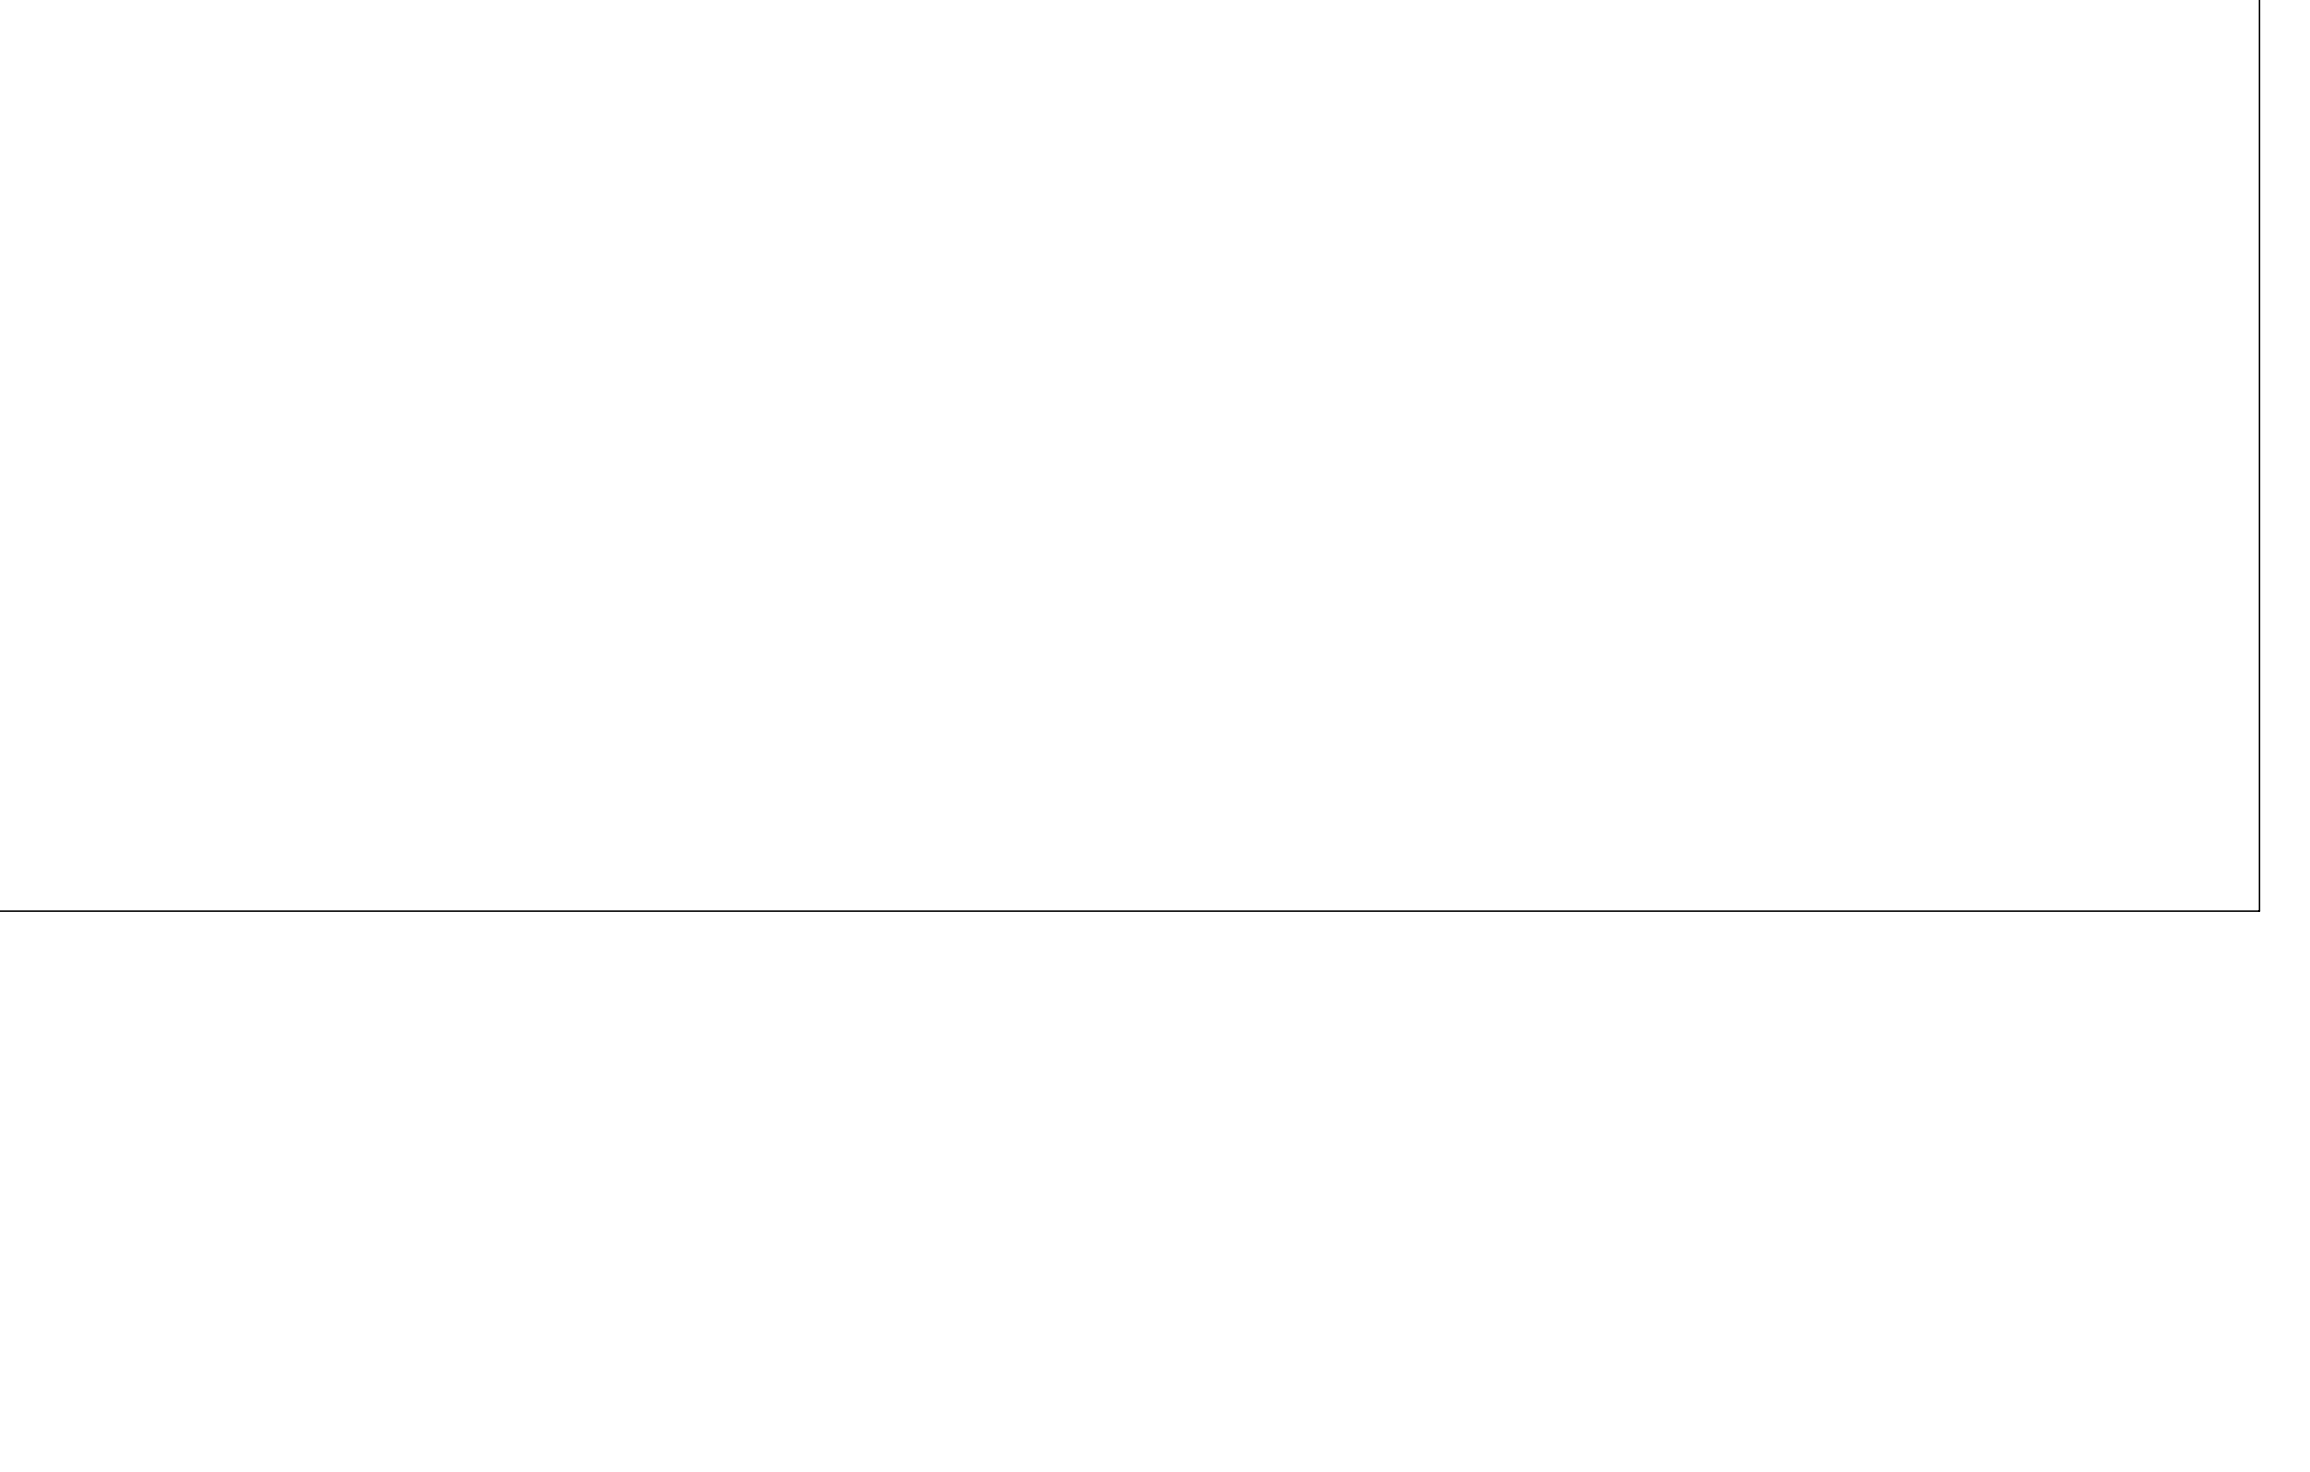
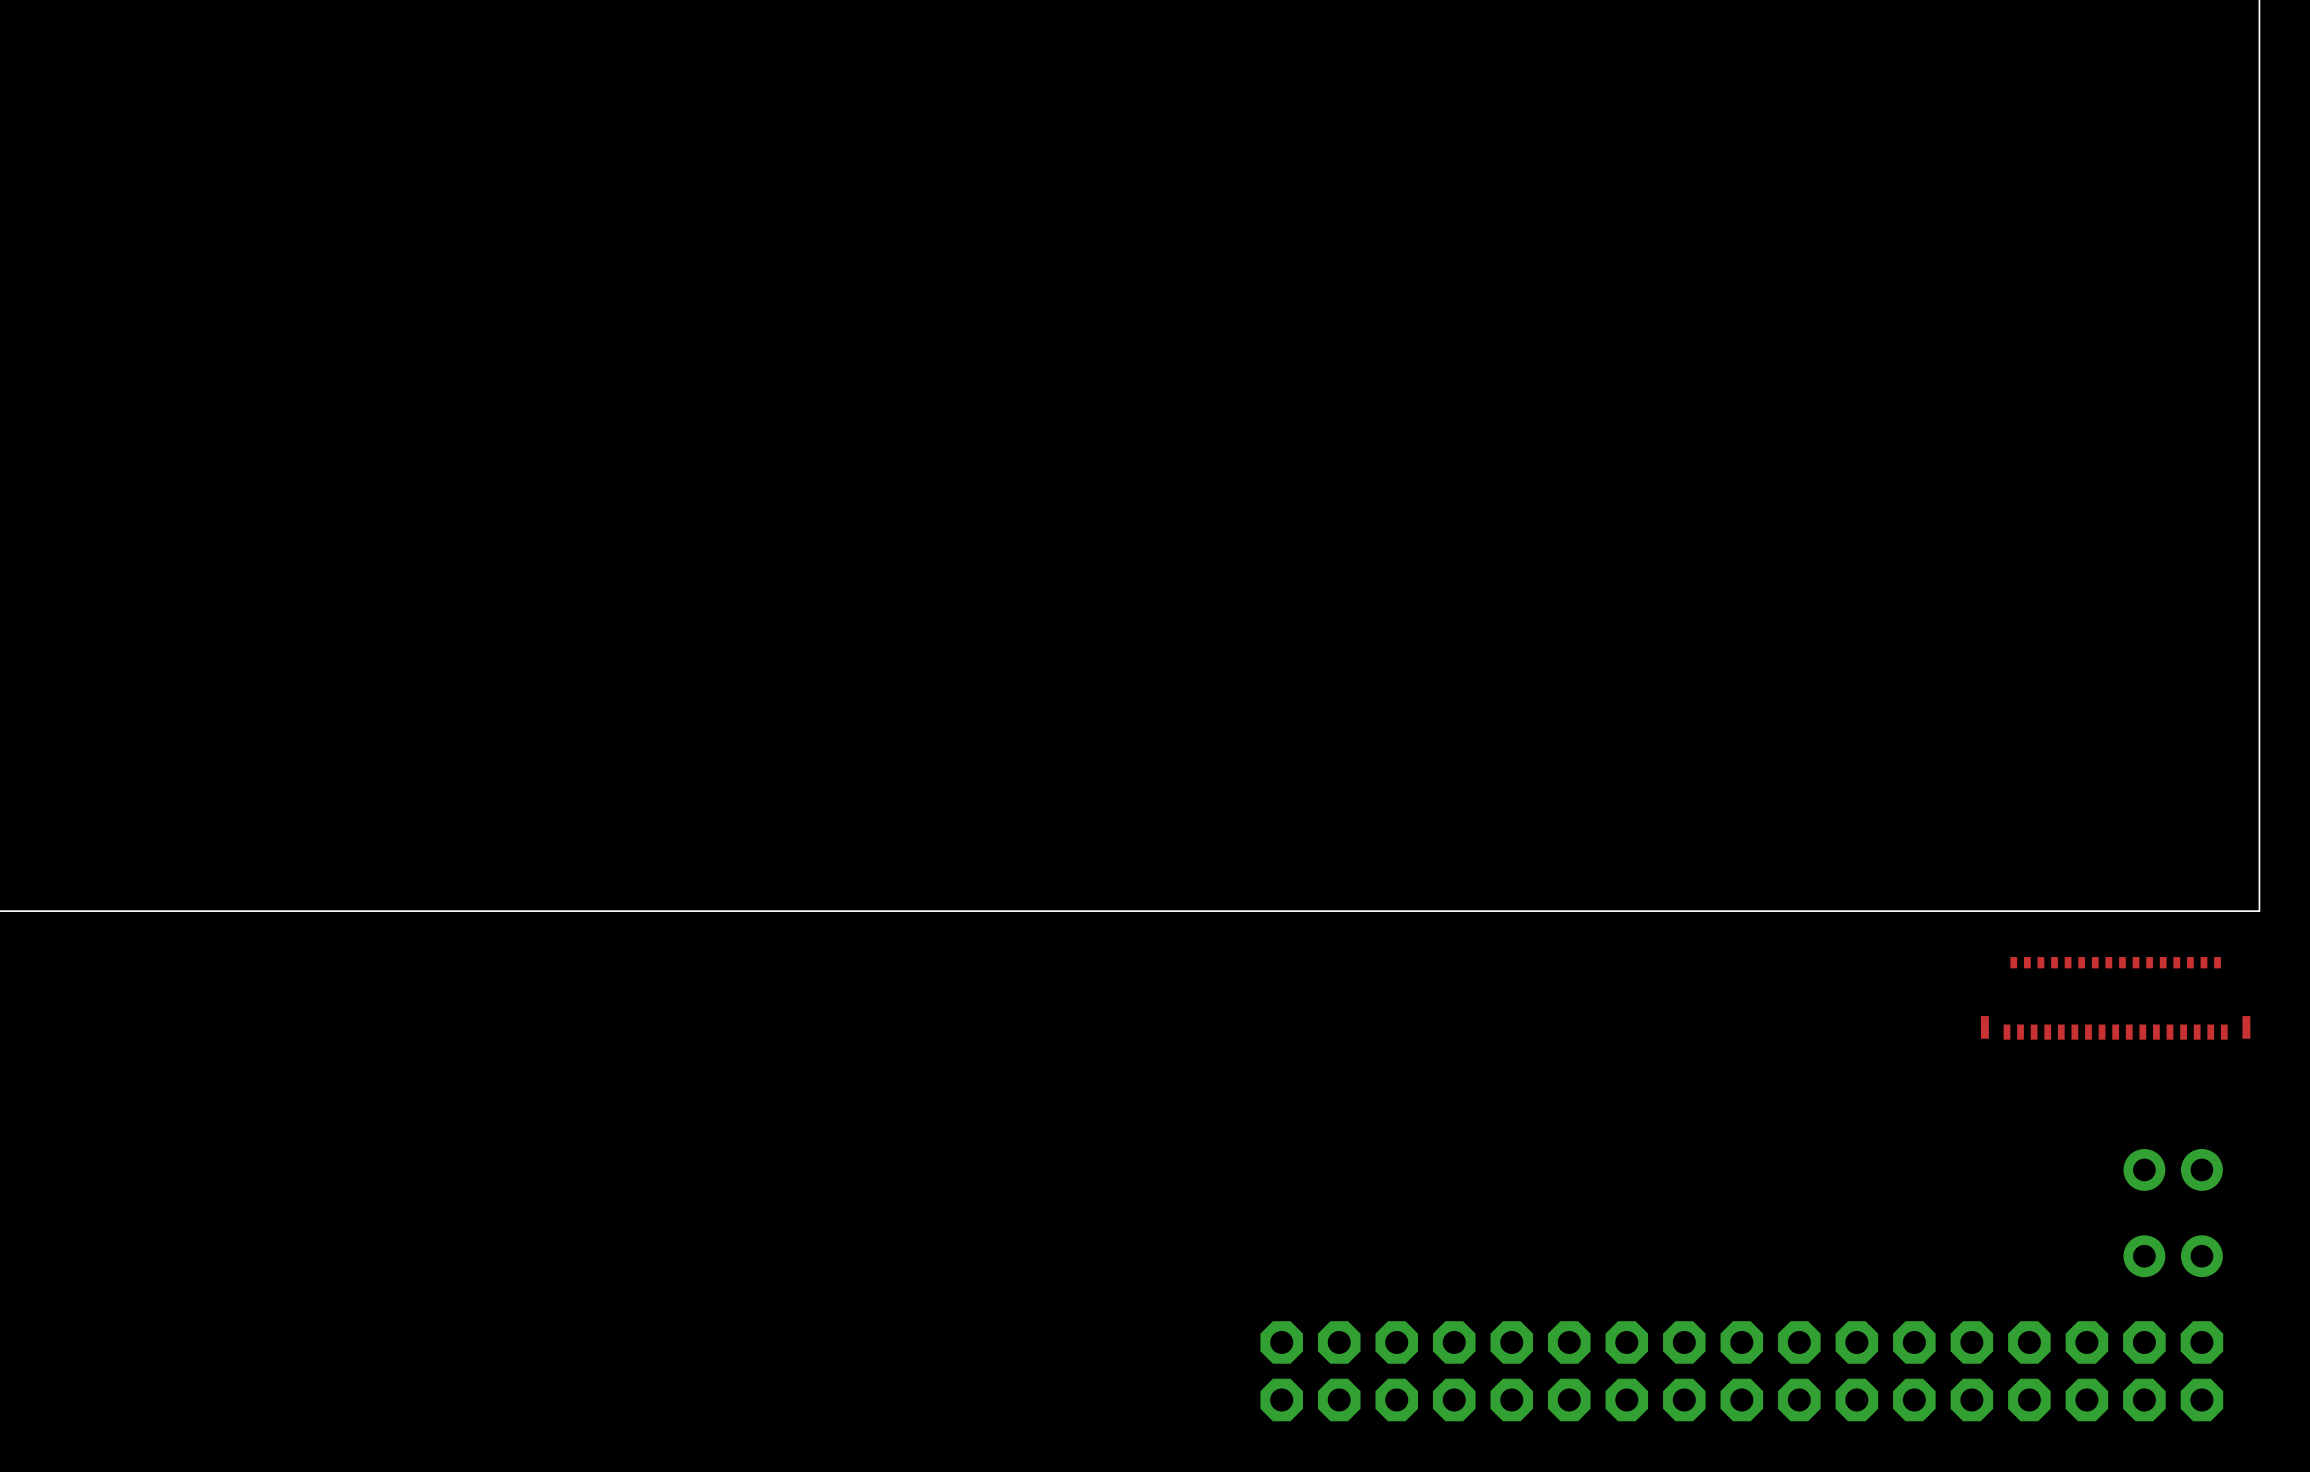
part: none -> (2115, 998)
part: none -> (2173, 1169)
part: none -> (2173, 1256)
part: none -> (1741, 1371)

